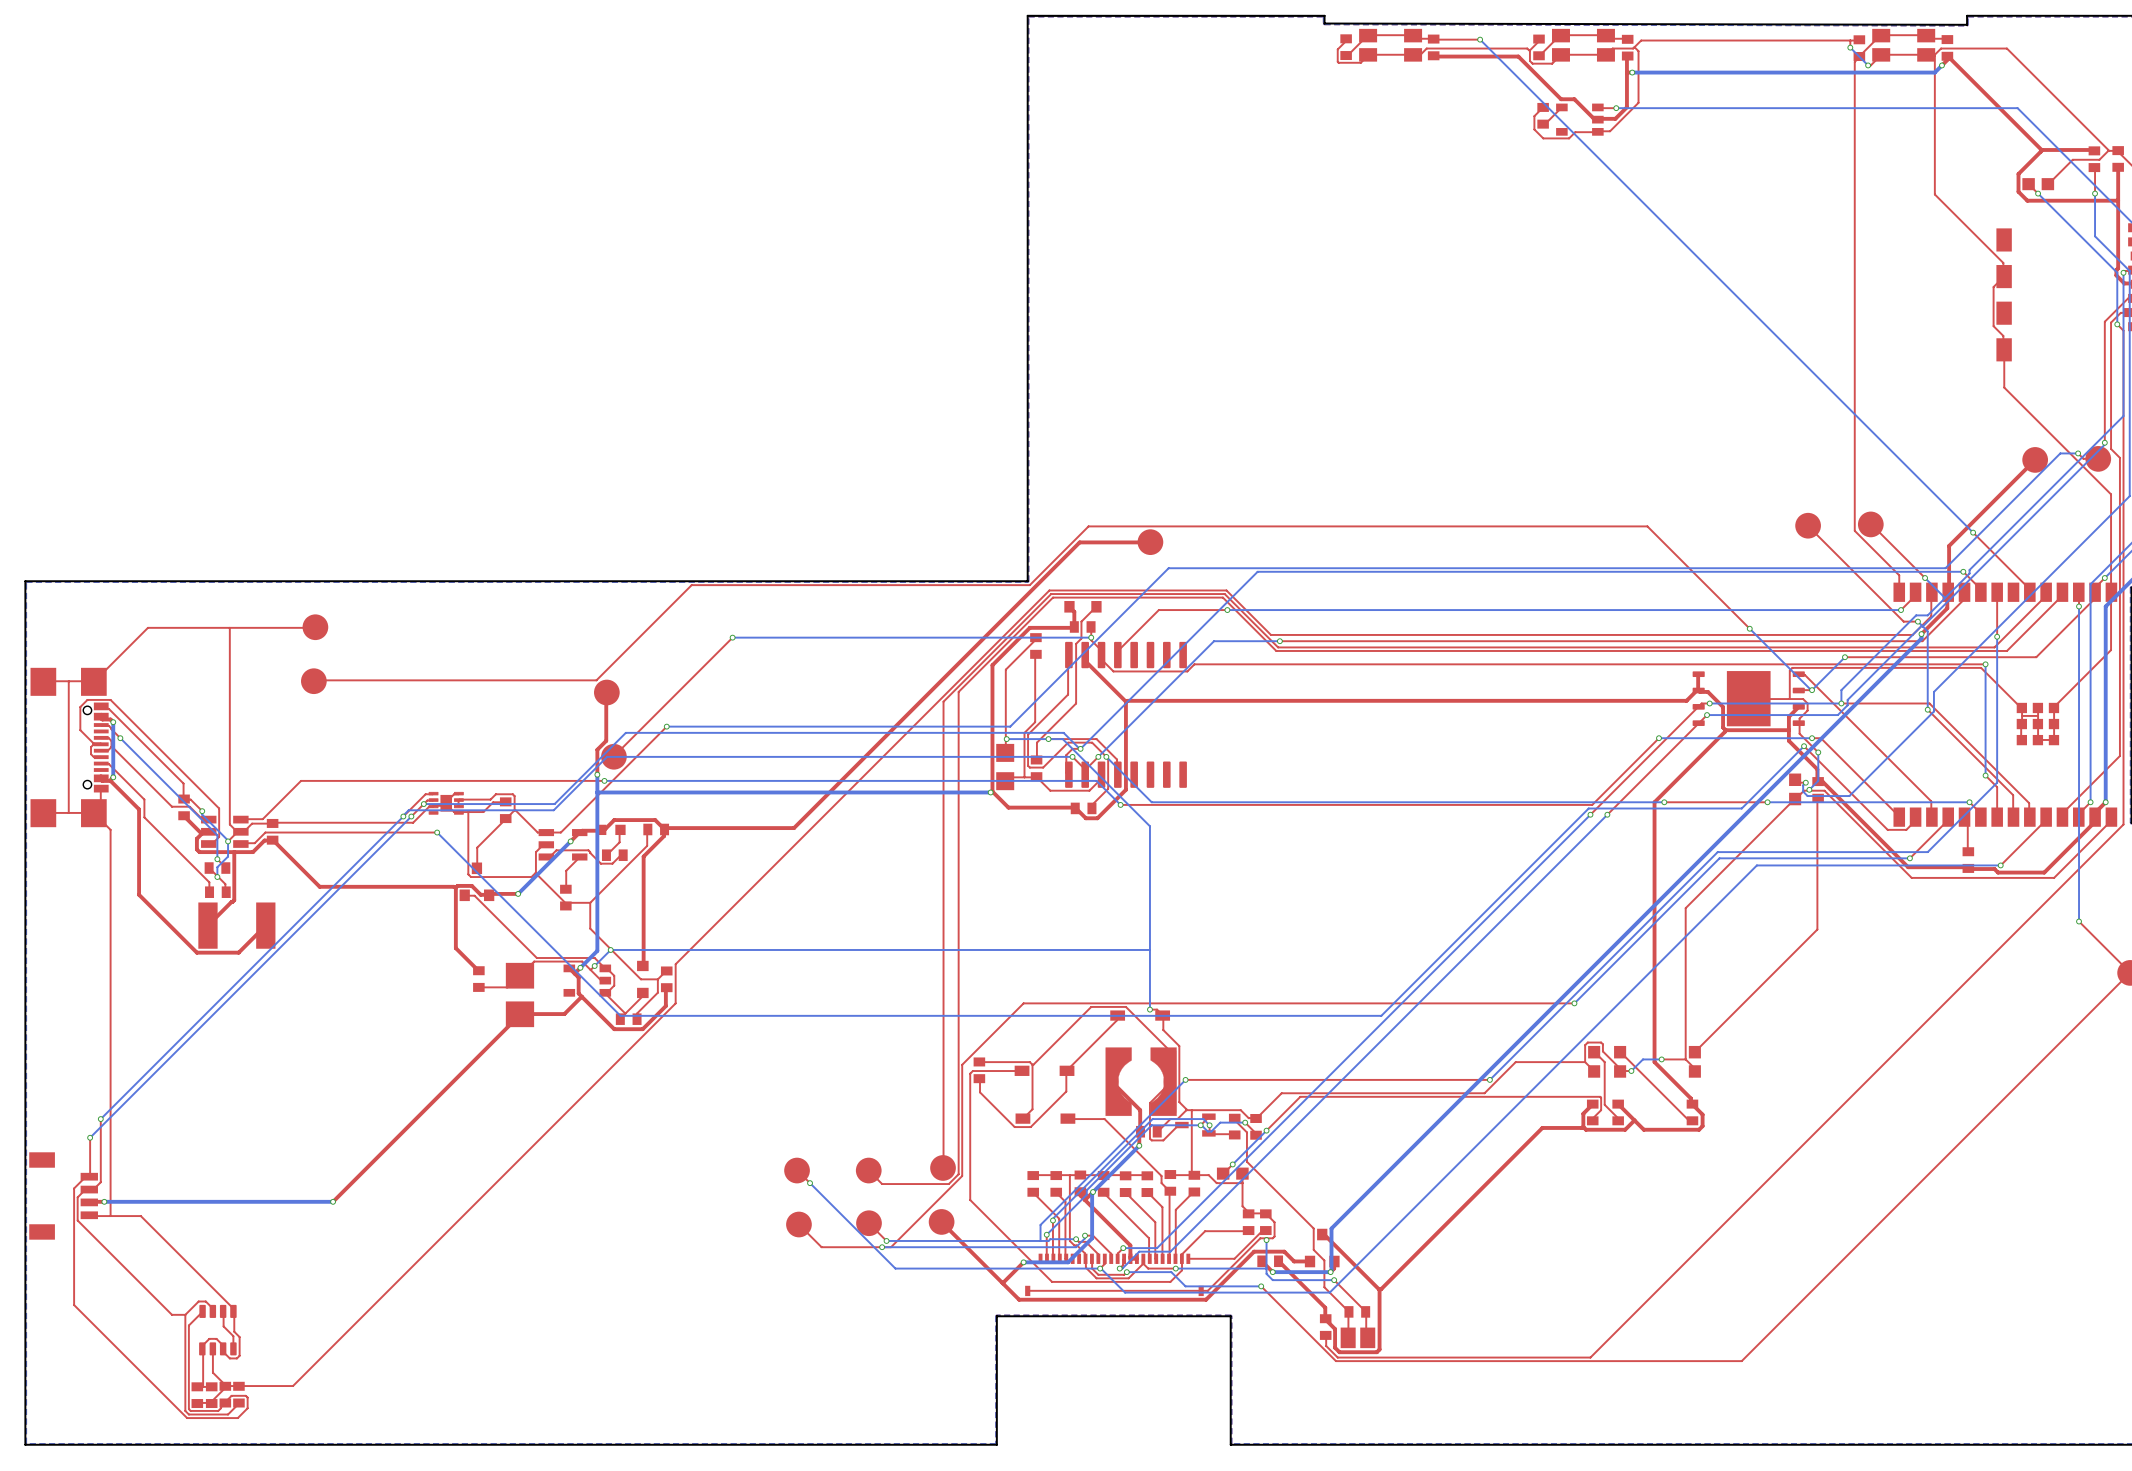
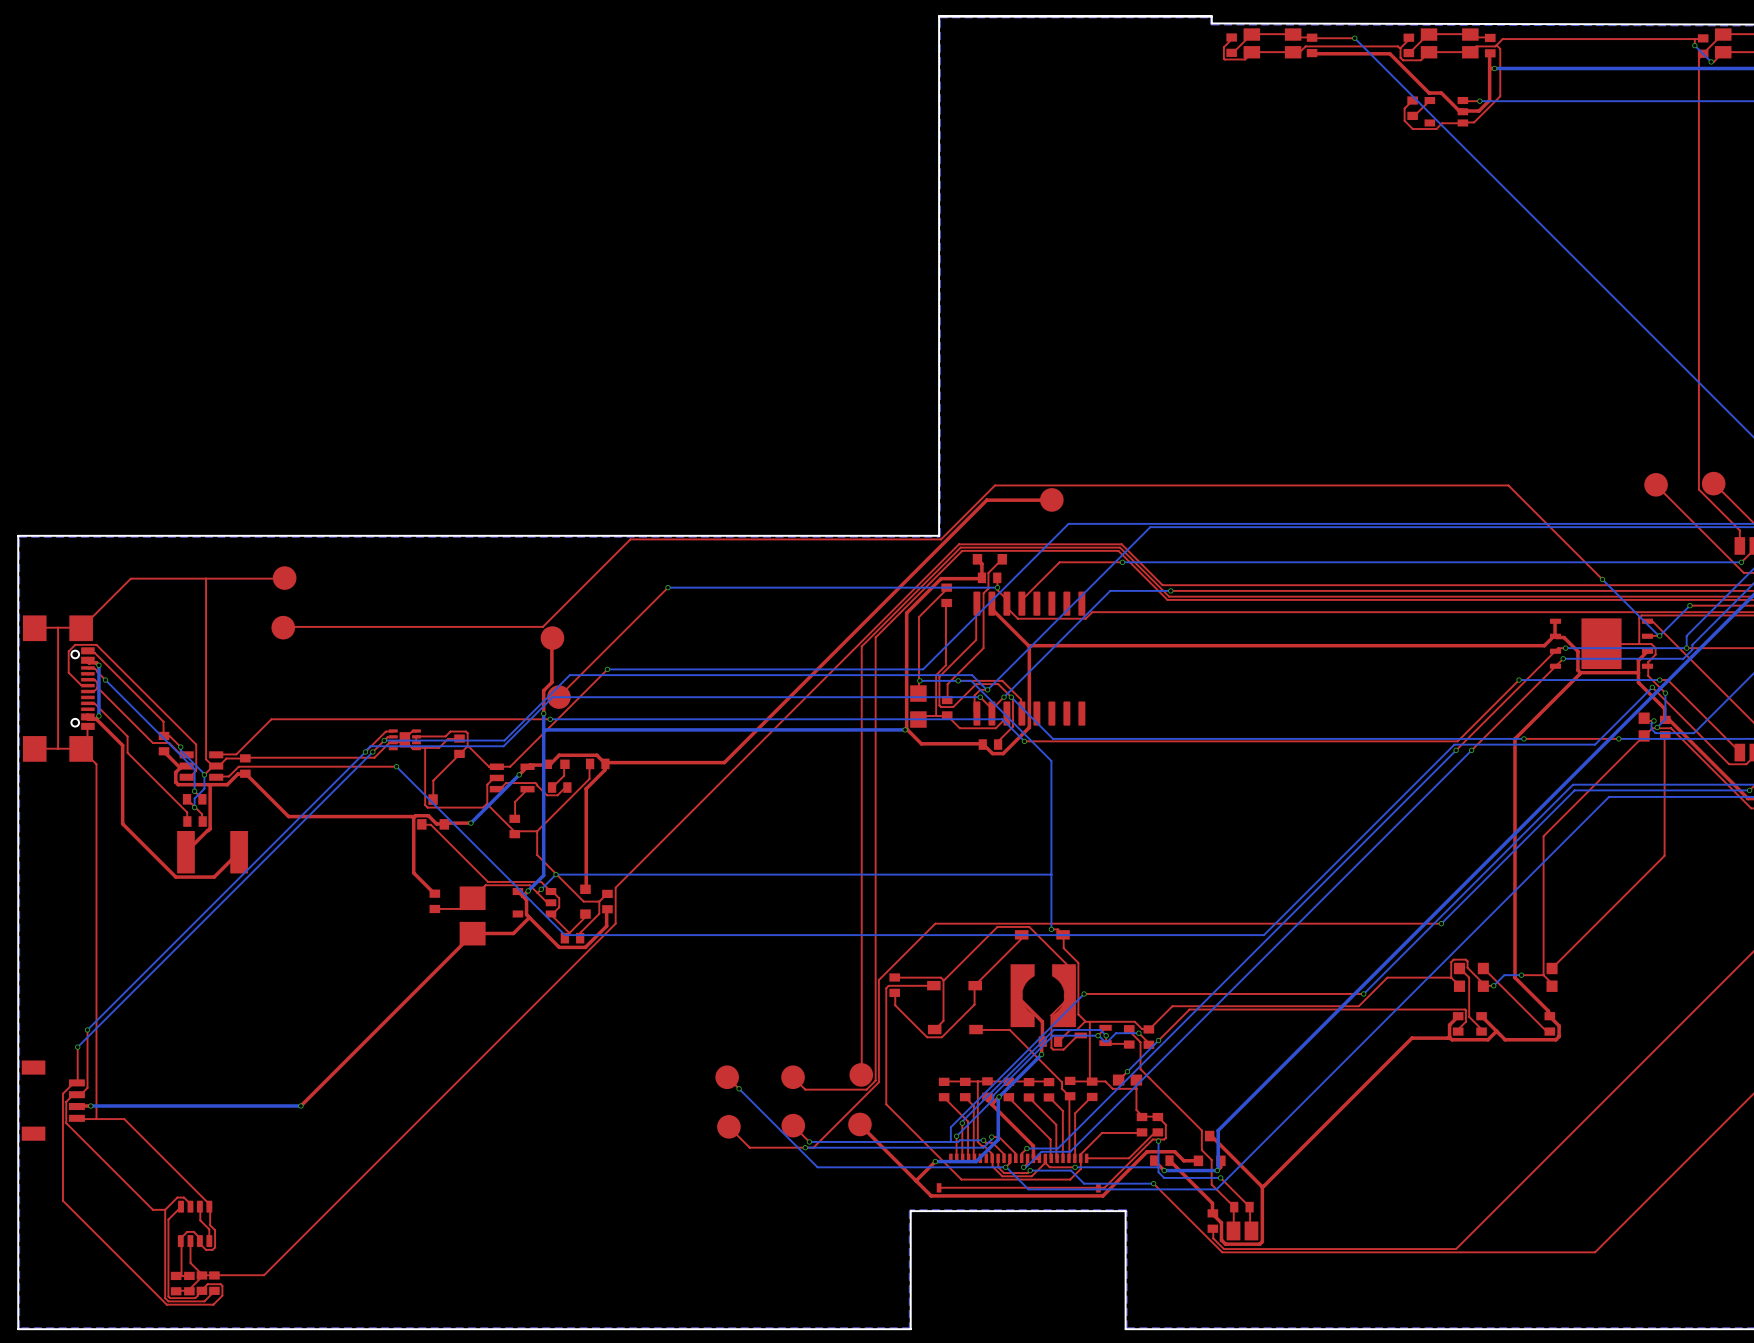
top track: (93, 743) (91, 747) (91, 754) (93, 756) (101, 757) -> none

